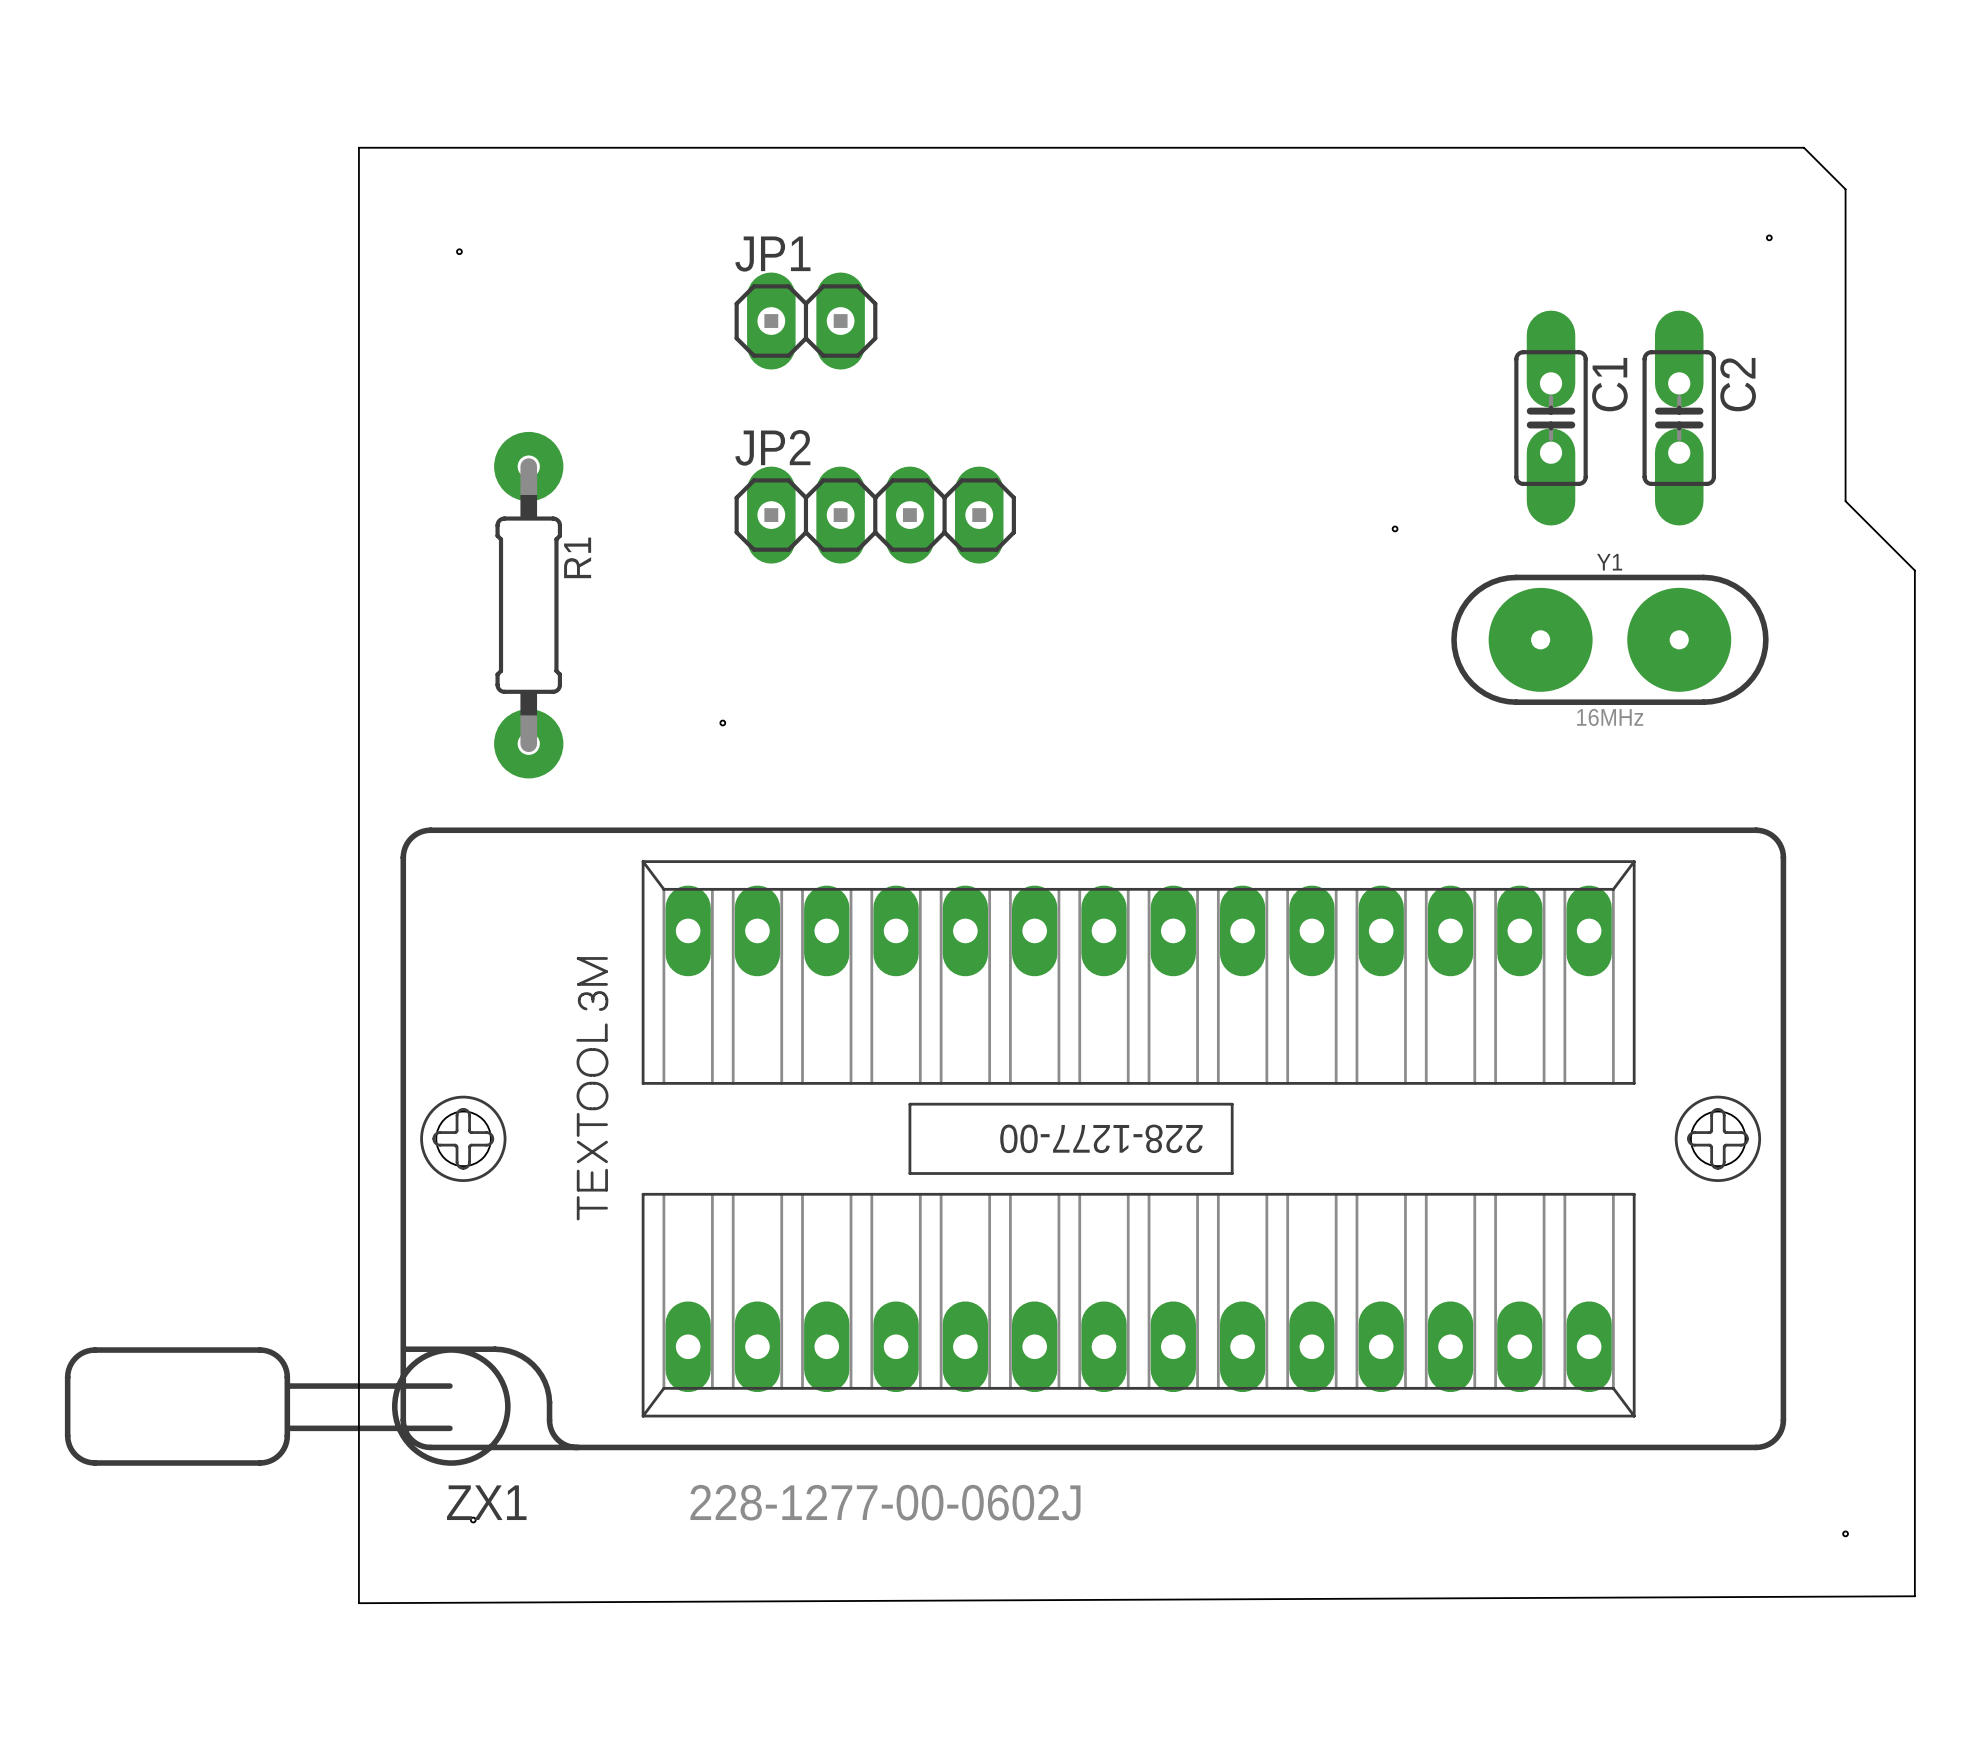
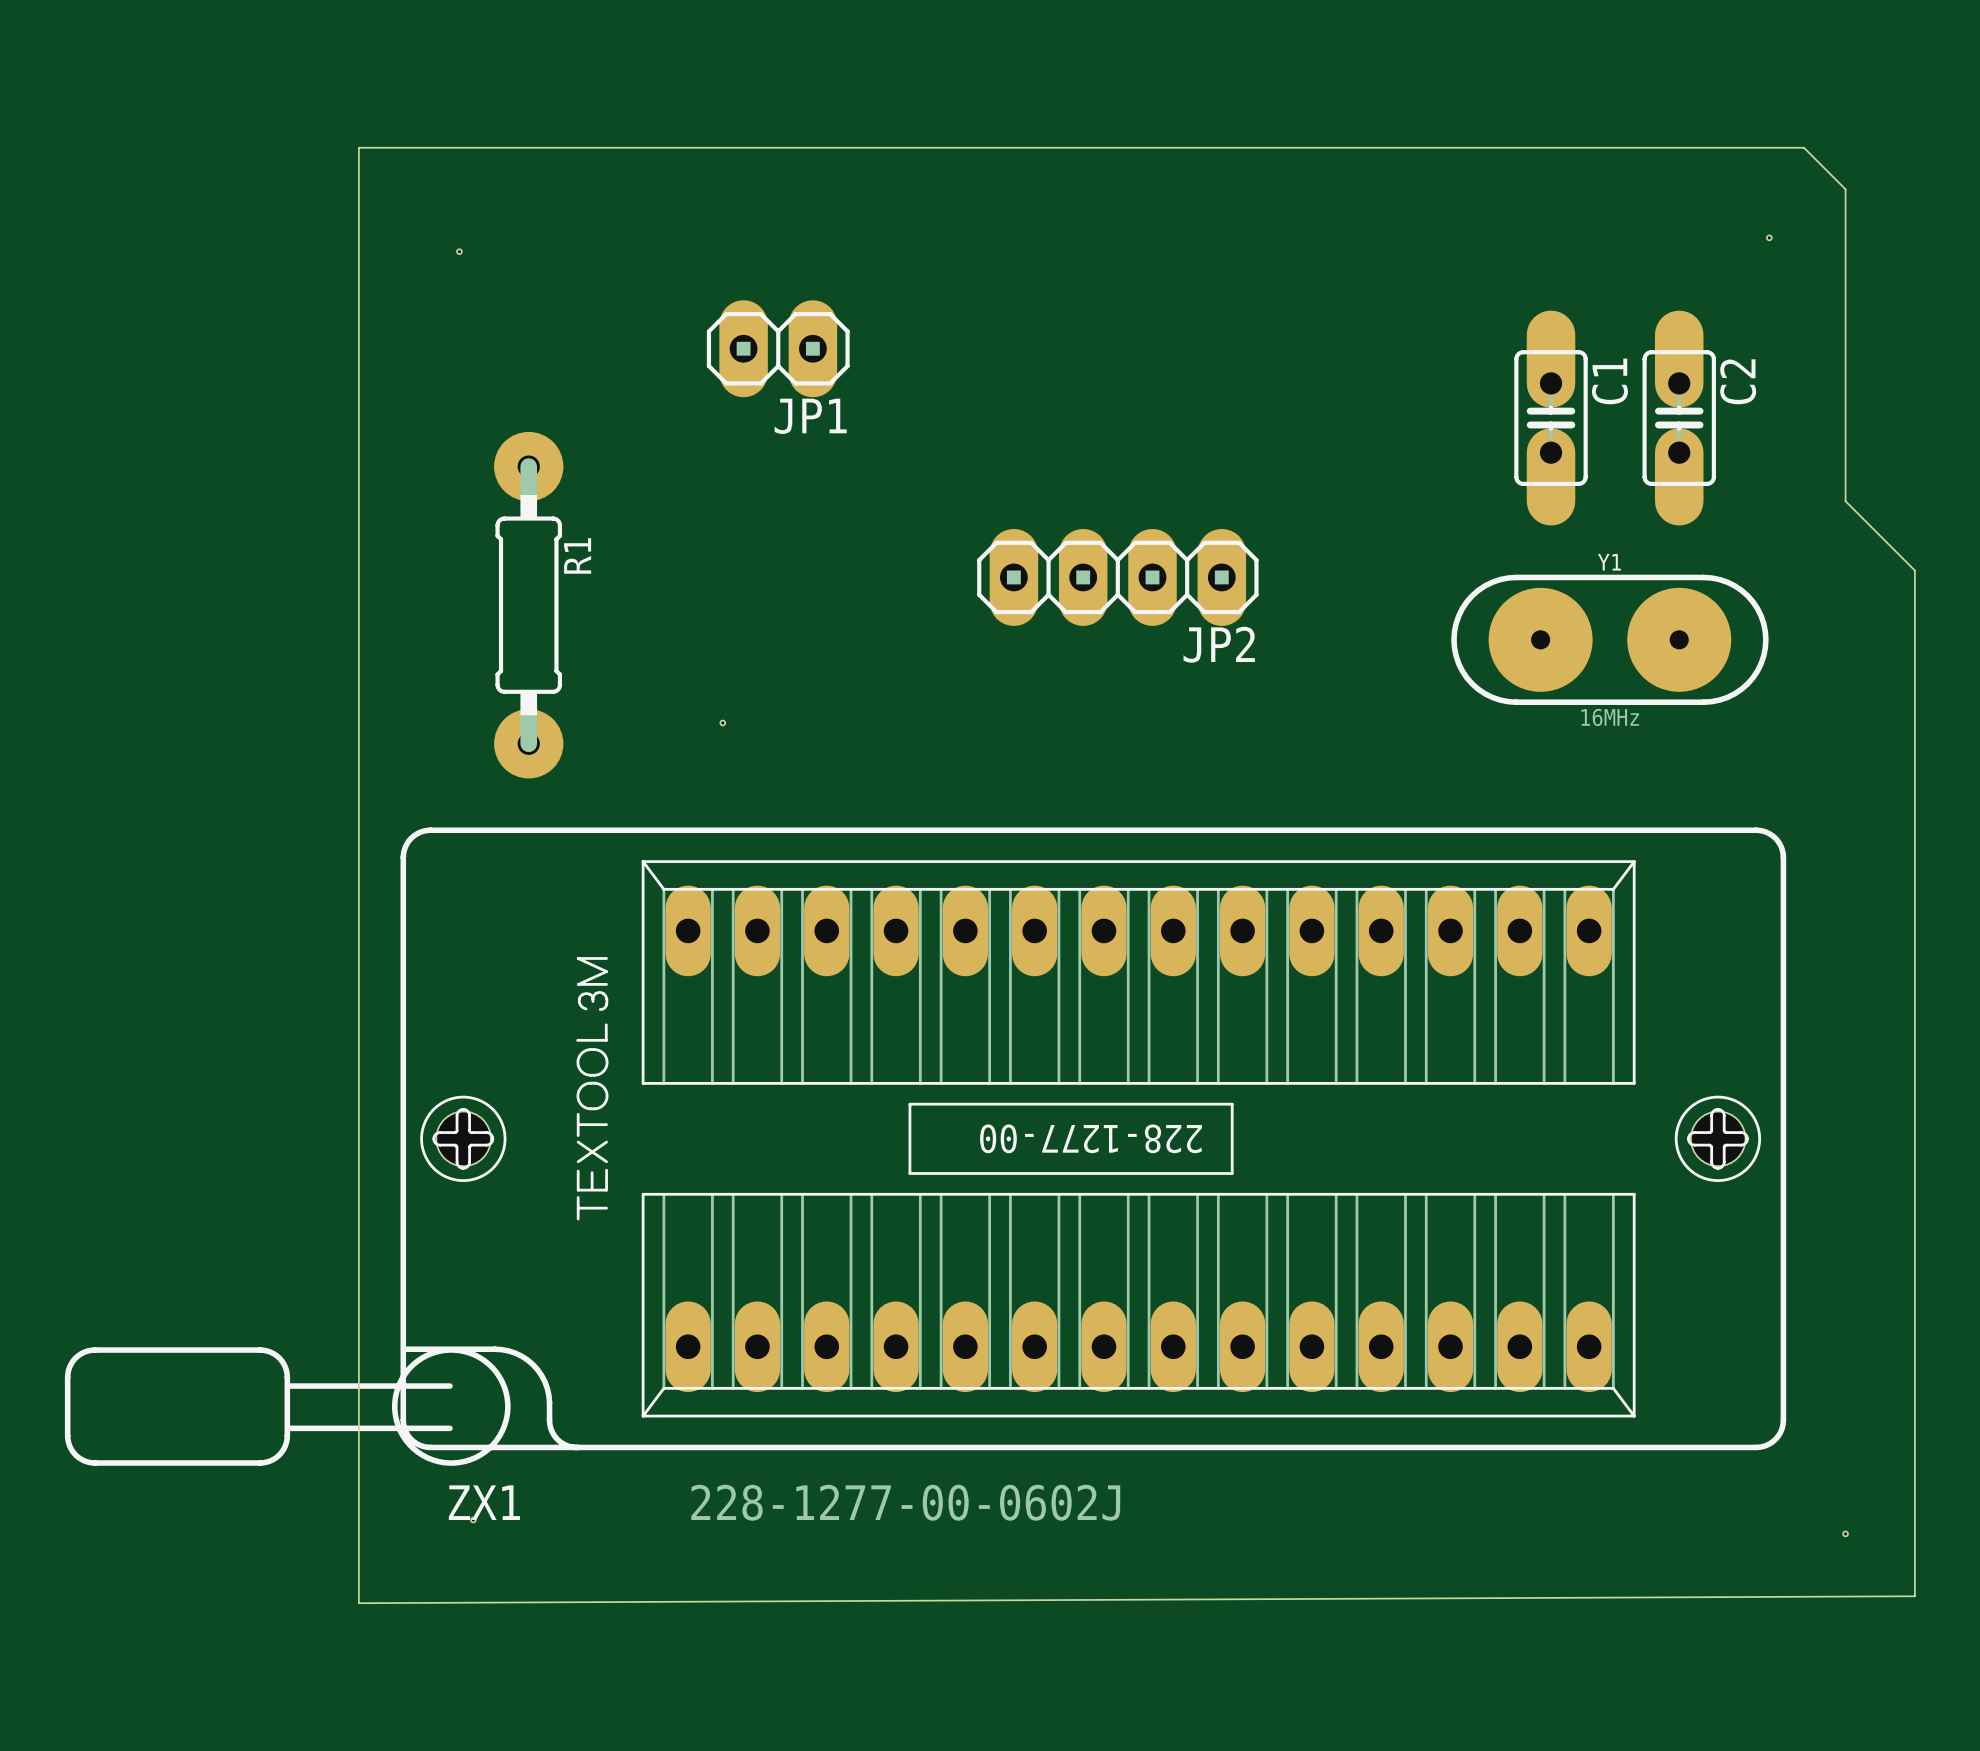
JP1 name position: JP1 (772, 254) -> JP1 (810, 416)
JP1 position: (805, 321) -> (778, 348)
JP2 name position: JP2 (772, 447) -> JP2 (1219, 644)
JP2 position: (875, 515) -> (1117, 577)
hole: (1395, 528) -> none

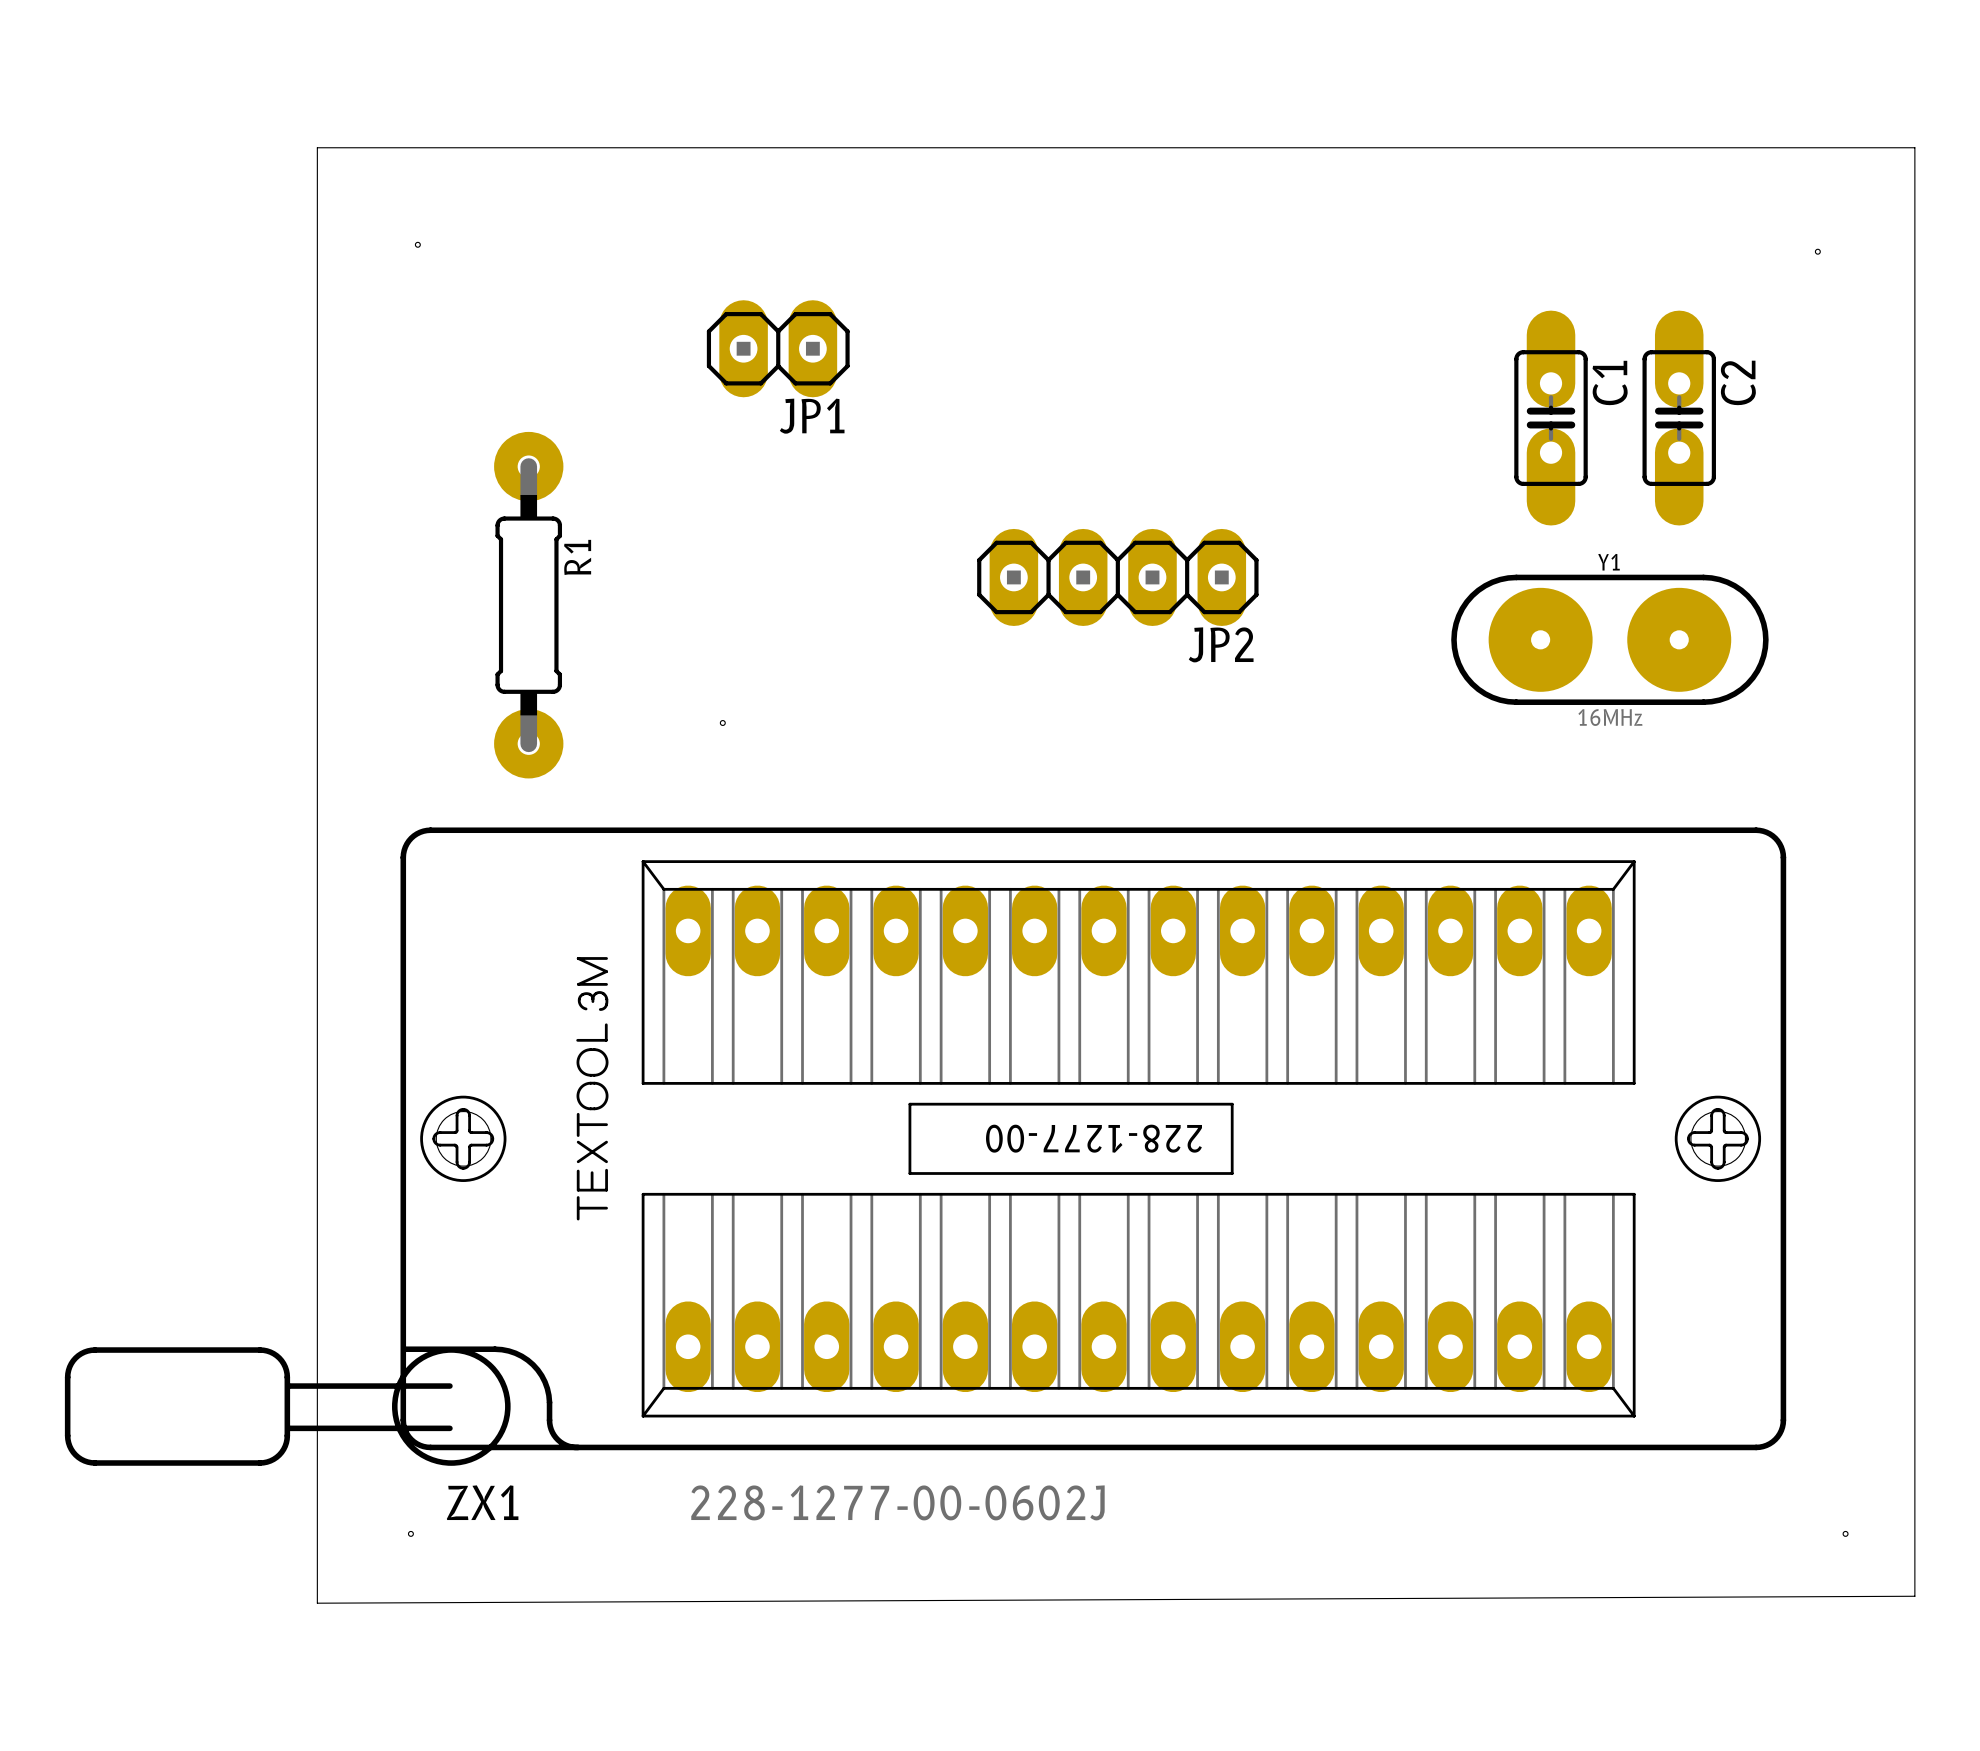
board edge: (358, 147) (358, 1603) (1914, 1596) -> (358, 147) (317, 147) (317, 1603) (1914, 1596)
board edge: (1803, 147) (1845, 189) (1845, 501) (1914, 570) -> (1803, 147) (1914, 147) (1914, 570)
hole position: (1769, 237) -> (1817, 251)
hole position: (459, 251) -> (417, 244)
hole position: (473, 1520) -> (410, 1533)

